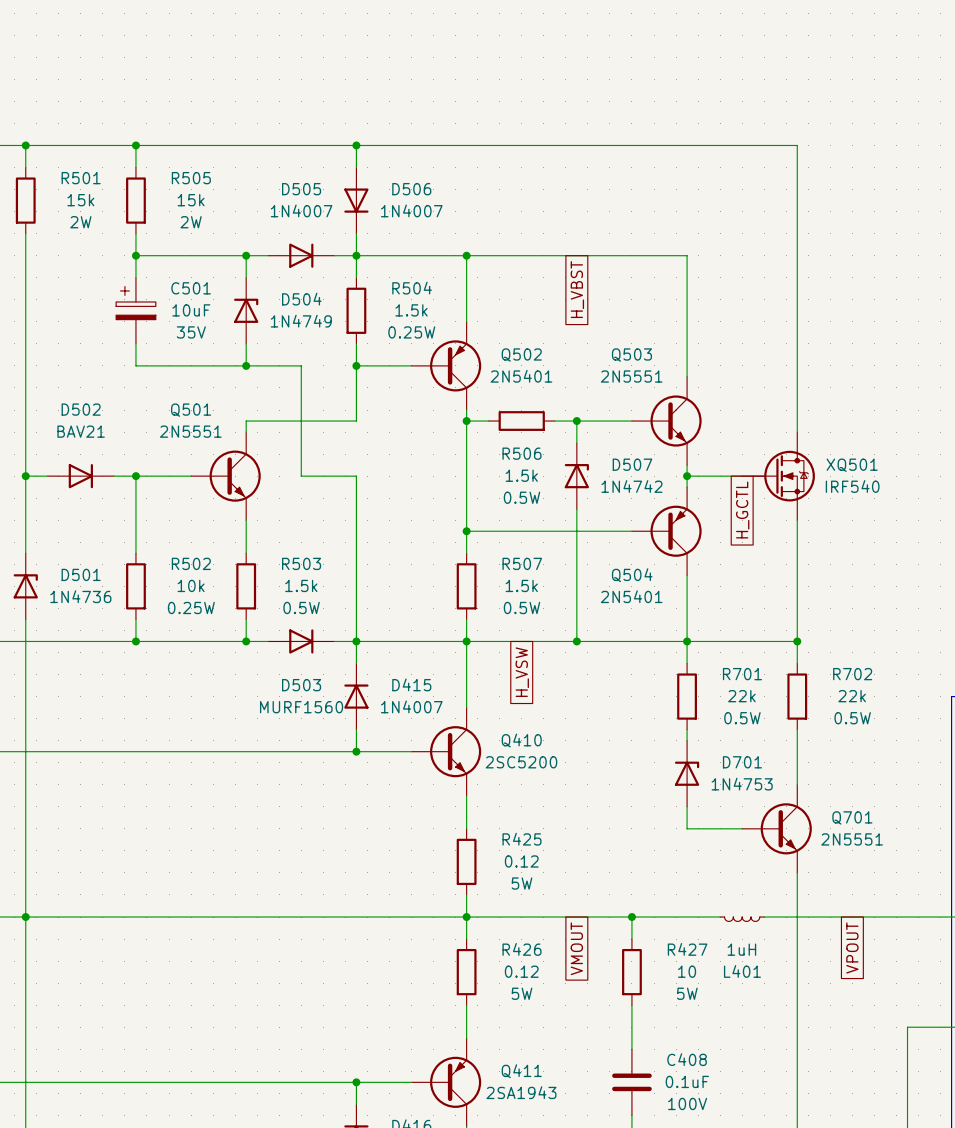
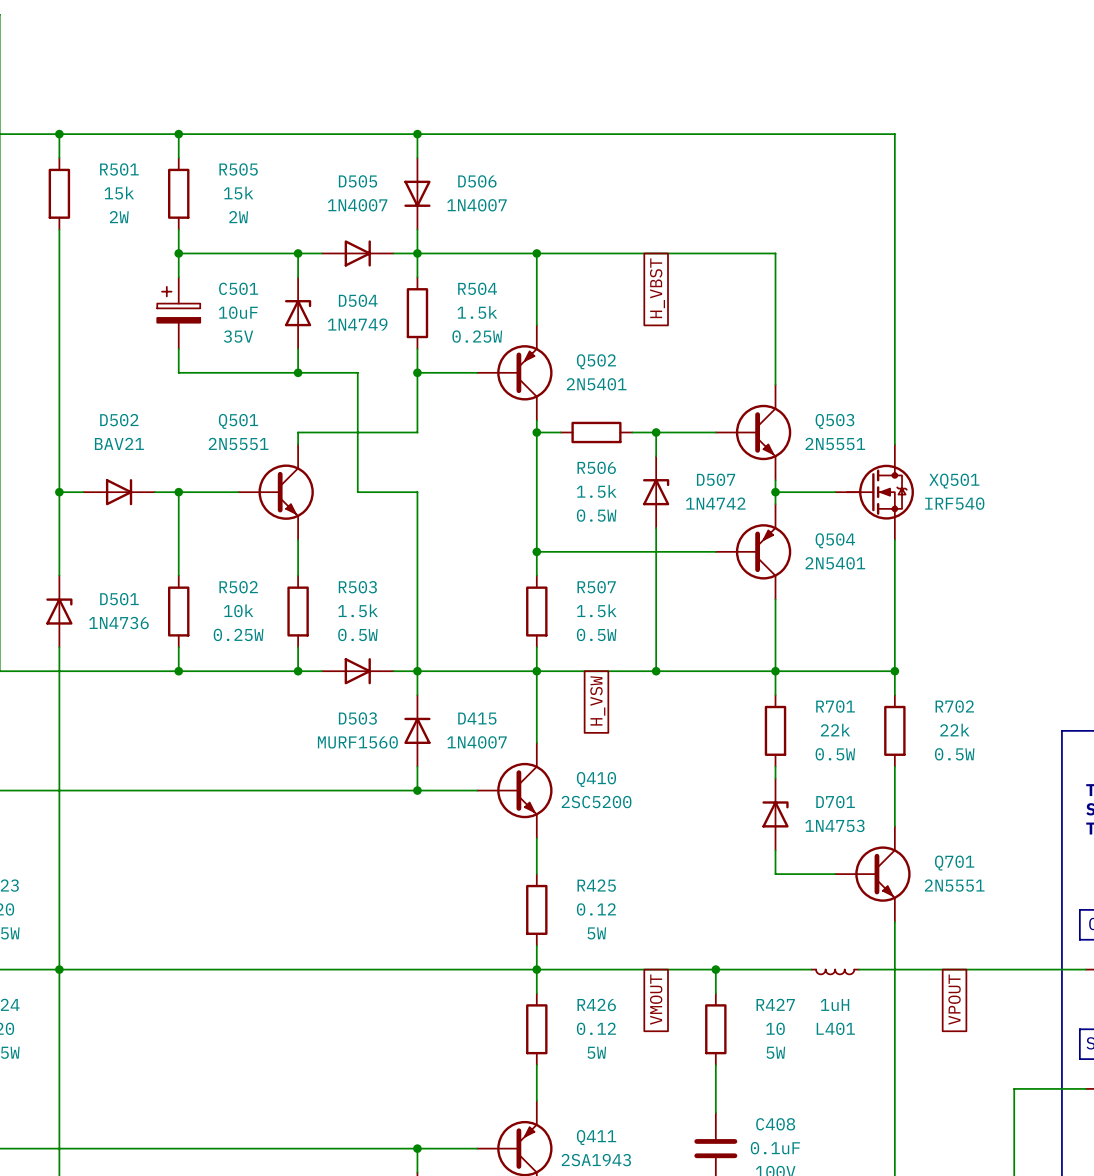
Q503 name position: Q503 (631, 355) -> Q503 (834, 421)
Q503 value position: 2N5551 (631, 376) -> 2N5551 (835, 443)
global label: H_GCTL (742, 510) -> none
Q504 name position: Q504 (632, 575) -> Q504 (835, 540)
Q504 value position: 2N5401 (631, 596) -> 2N5401 (835, 563)

